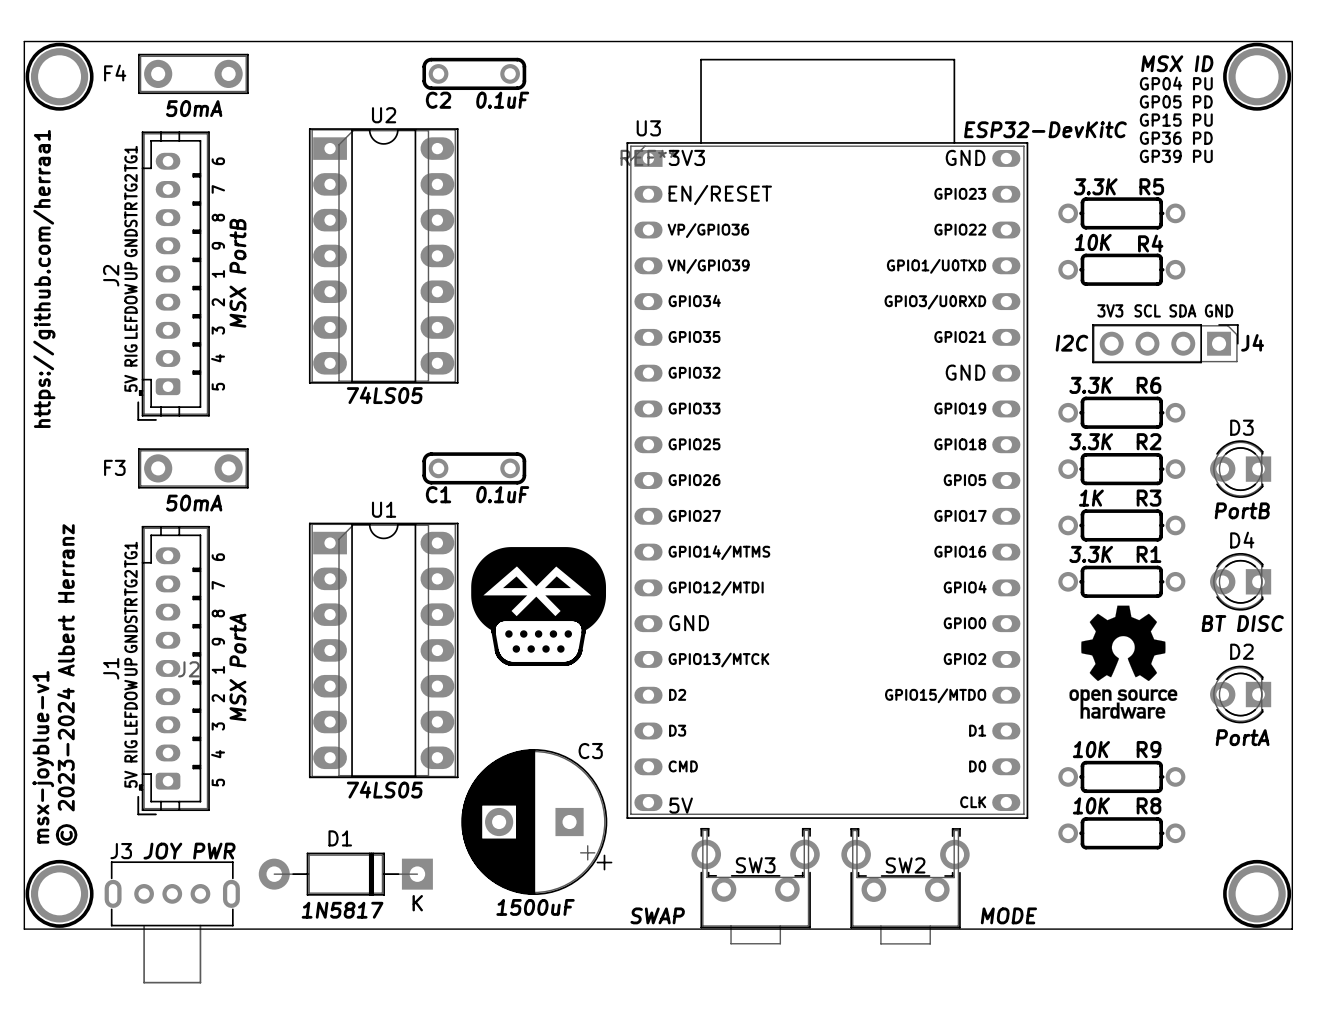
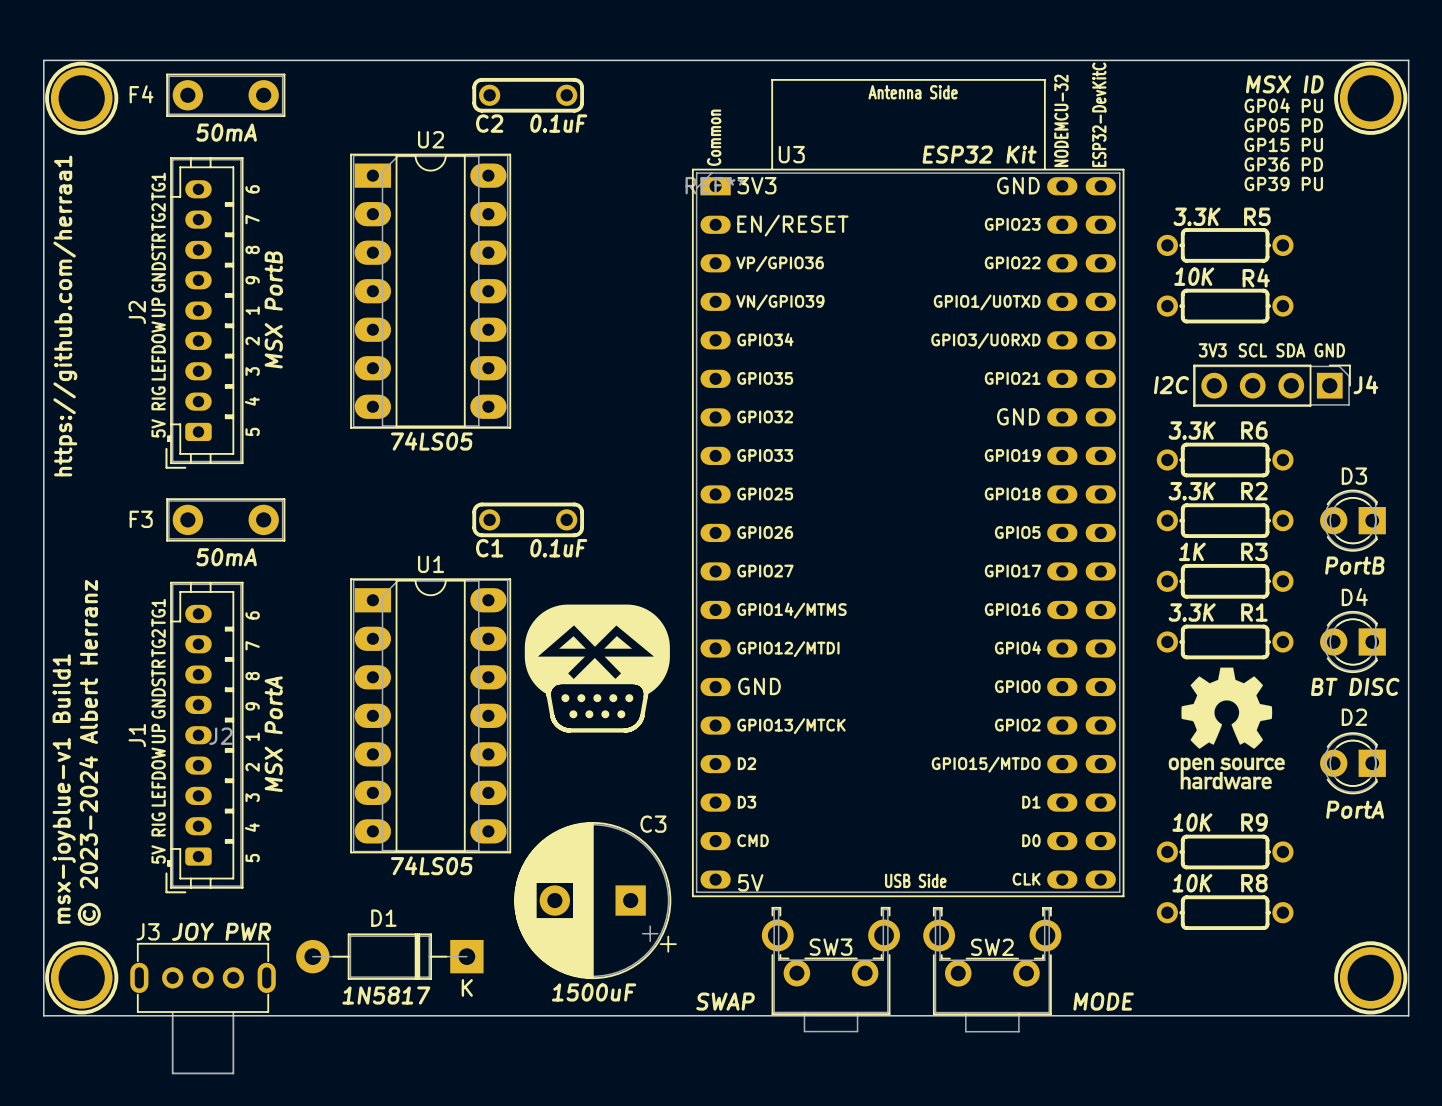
U3 footprint: [626, 58, 1029, 819] -> [691, 79, 1125, 898]
U3 name position: U3 (648, 128) -> U3 (791, 154)
U3 value: ESP32-DevKitC (1045, 129) -> ESP32 Kit (979, 154)
text: msx-joyblue-v1 (43, 757) -> msx-joyblue-v1 Build1 (64, 788)

